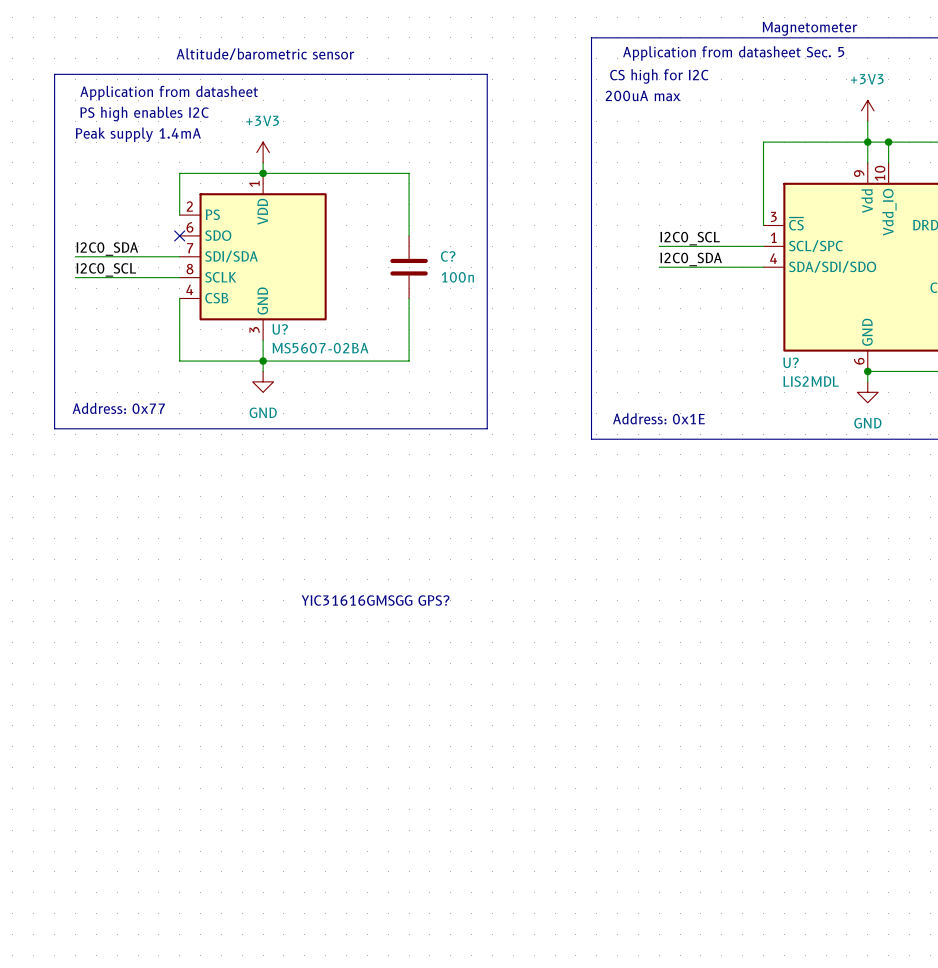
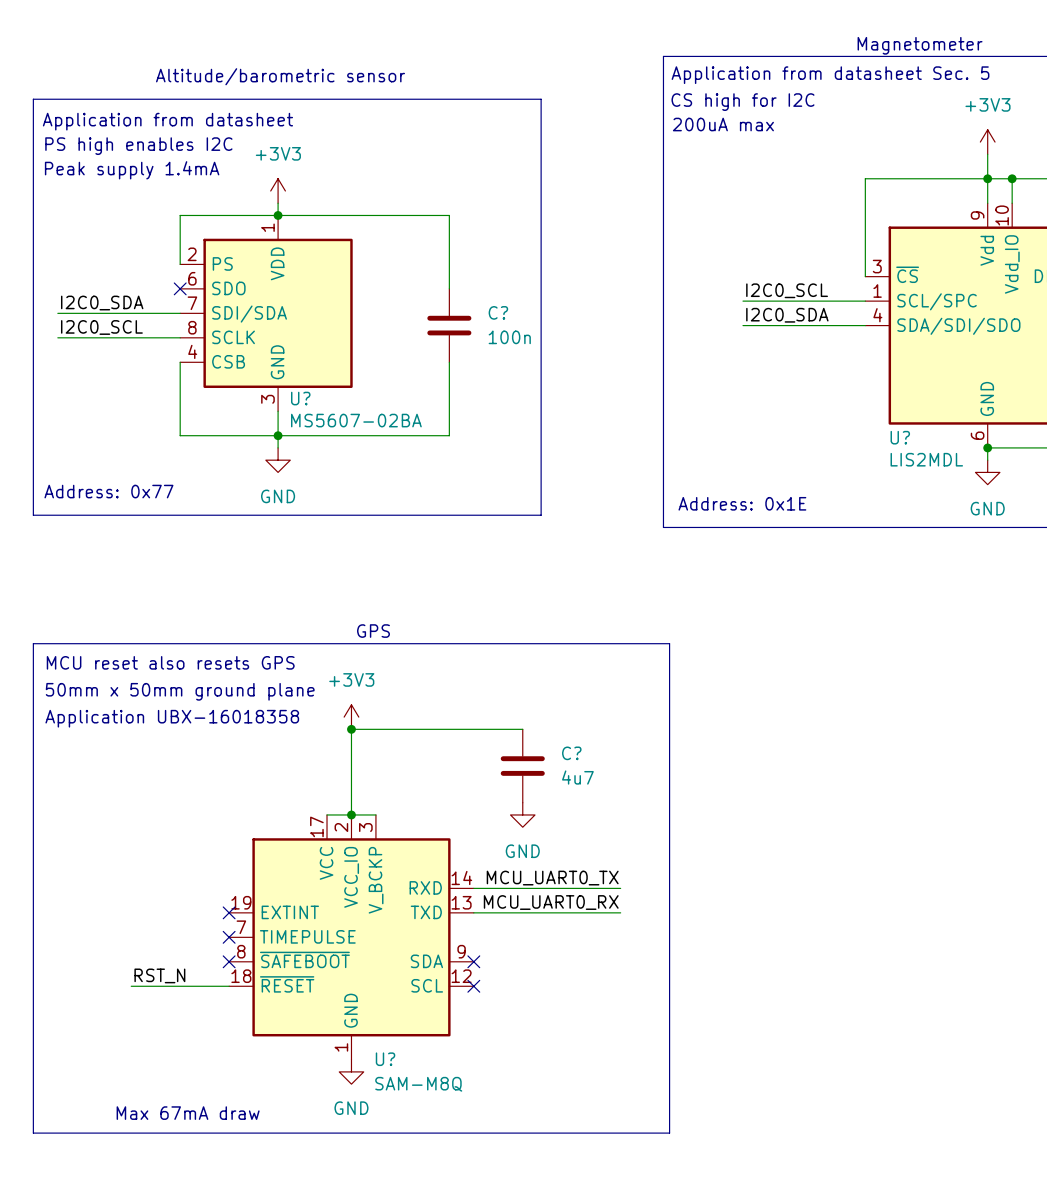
text: none -> GPS (373, 631)
line: none -> (33, 643) (669, 643) (669, 1133) (33, 1133) (33, 643)
text: none -> MCU reset also resets GPS (170, 662)
text: none -> 50mm x 50mm ground plane (180, 691)
power symbol: none -> +3V3 (351, 717)
text: YIC31616GMSGG GPS? (375, 600) -> none
text: none -> Application UBX-16018358 (172, 718)
junction: none -> (351, 729)
wire: none -> (522, 729) (351, 729) (351, 814)
C?: none -> 4u7 (522, 766)
wire: none -> (327, 814) (375, 814)
junction: none -> (351, 814)
power symbol: none -> GND (522, 814)
label: none -> MCU_UART0_TX (552, 878)
wire: none -> (473, 888) (620, 888)
label: none -> MCU_UART0_RX (551, 902)
no-connect mark: none -> (229, 912)
wire: none -> (473, 912) (620, 912)
no-connect mark: none -> (229, 937)
U?: none -> SAM-M8Q (351, 937)
no-connect mark: none -> (229, 961)
no-connect mark: none -> (473, 961)
label: none -> RST_N (159, 975)
wire: none -> (131, 986) (229, 986)
no-connect mark: none -> (473, 986)
power symbol: none -> GND (351, 1071)
text: none -> Max 67mA draw (188, 1113)

